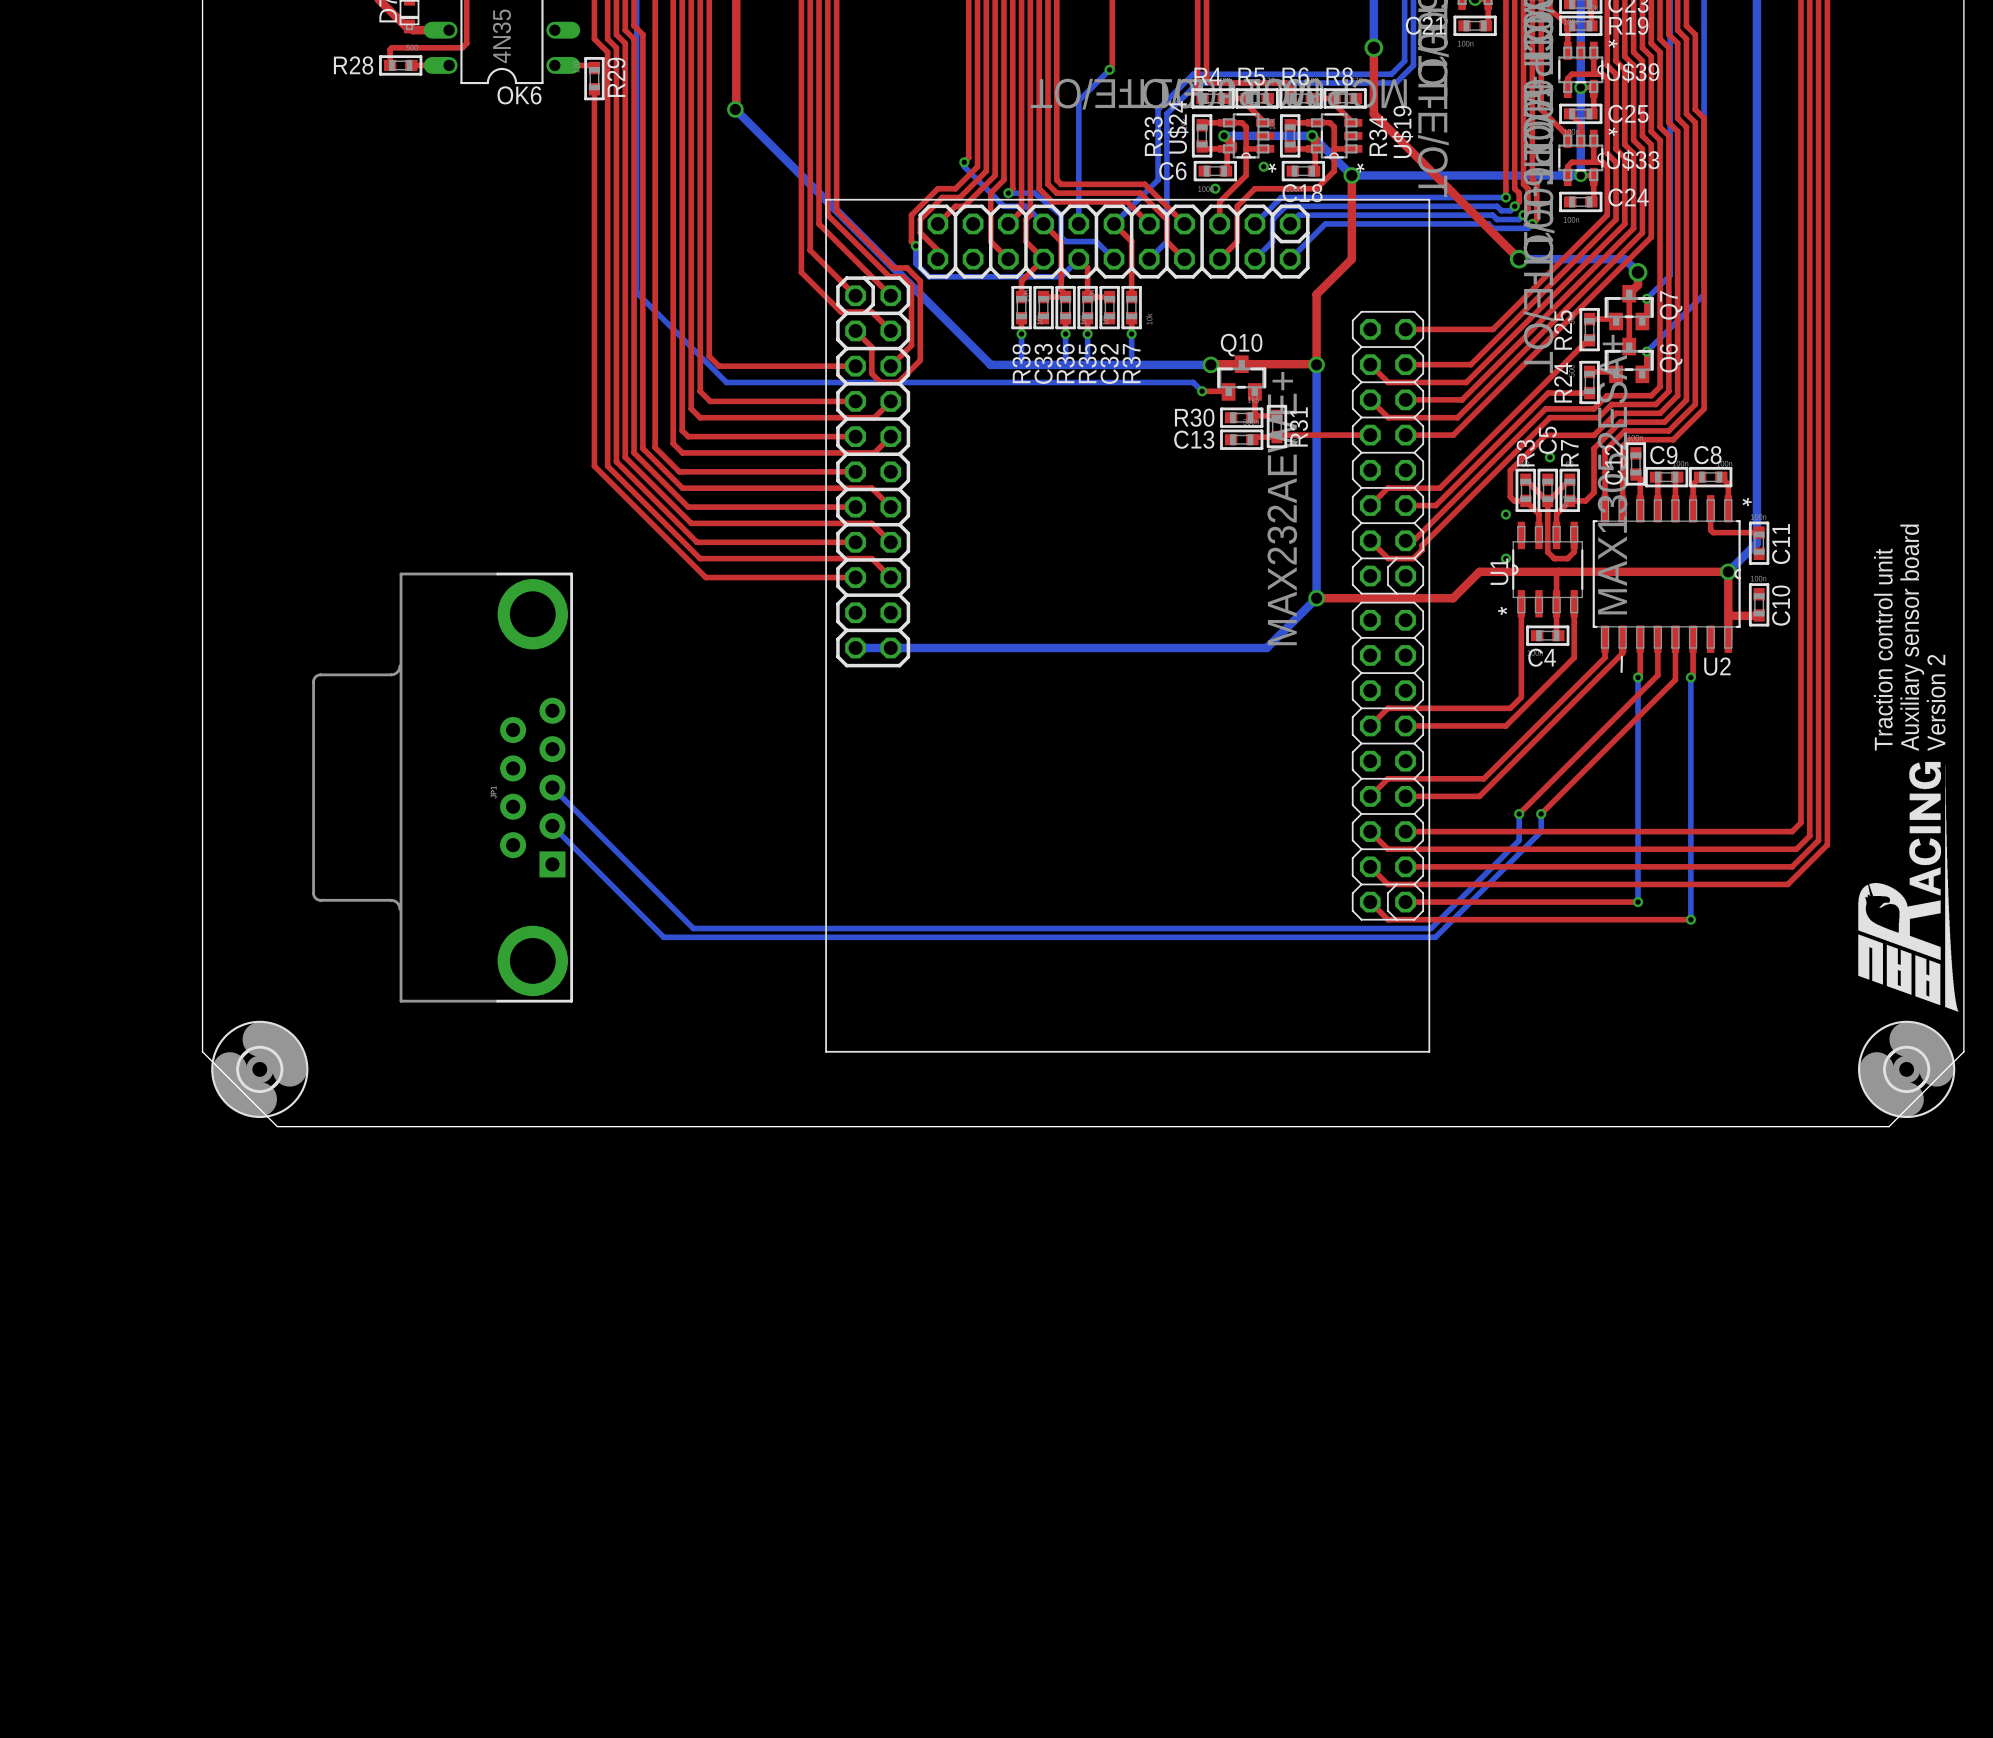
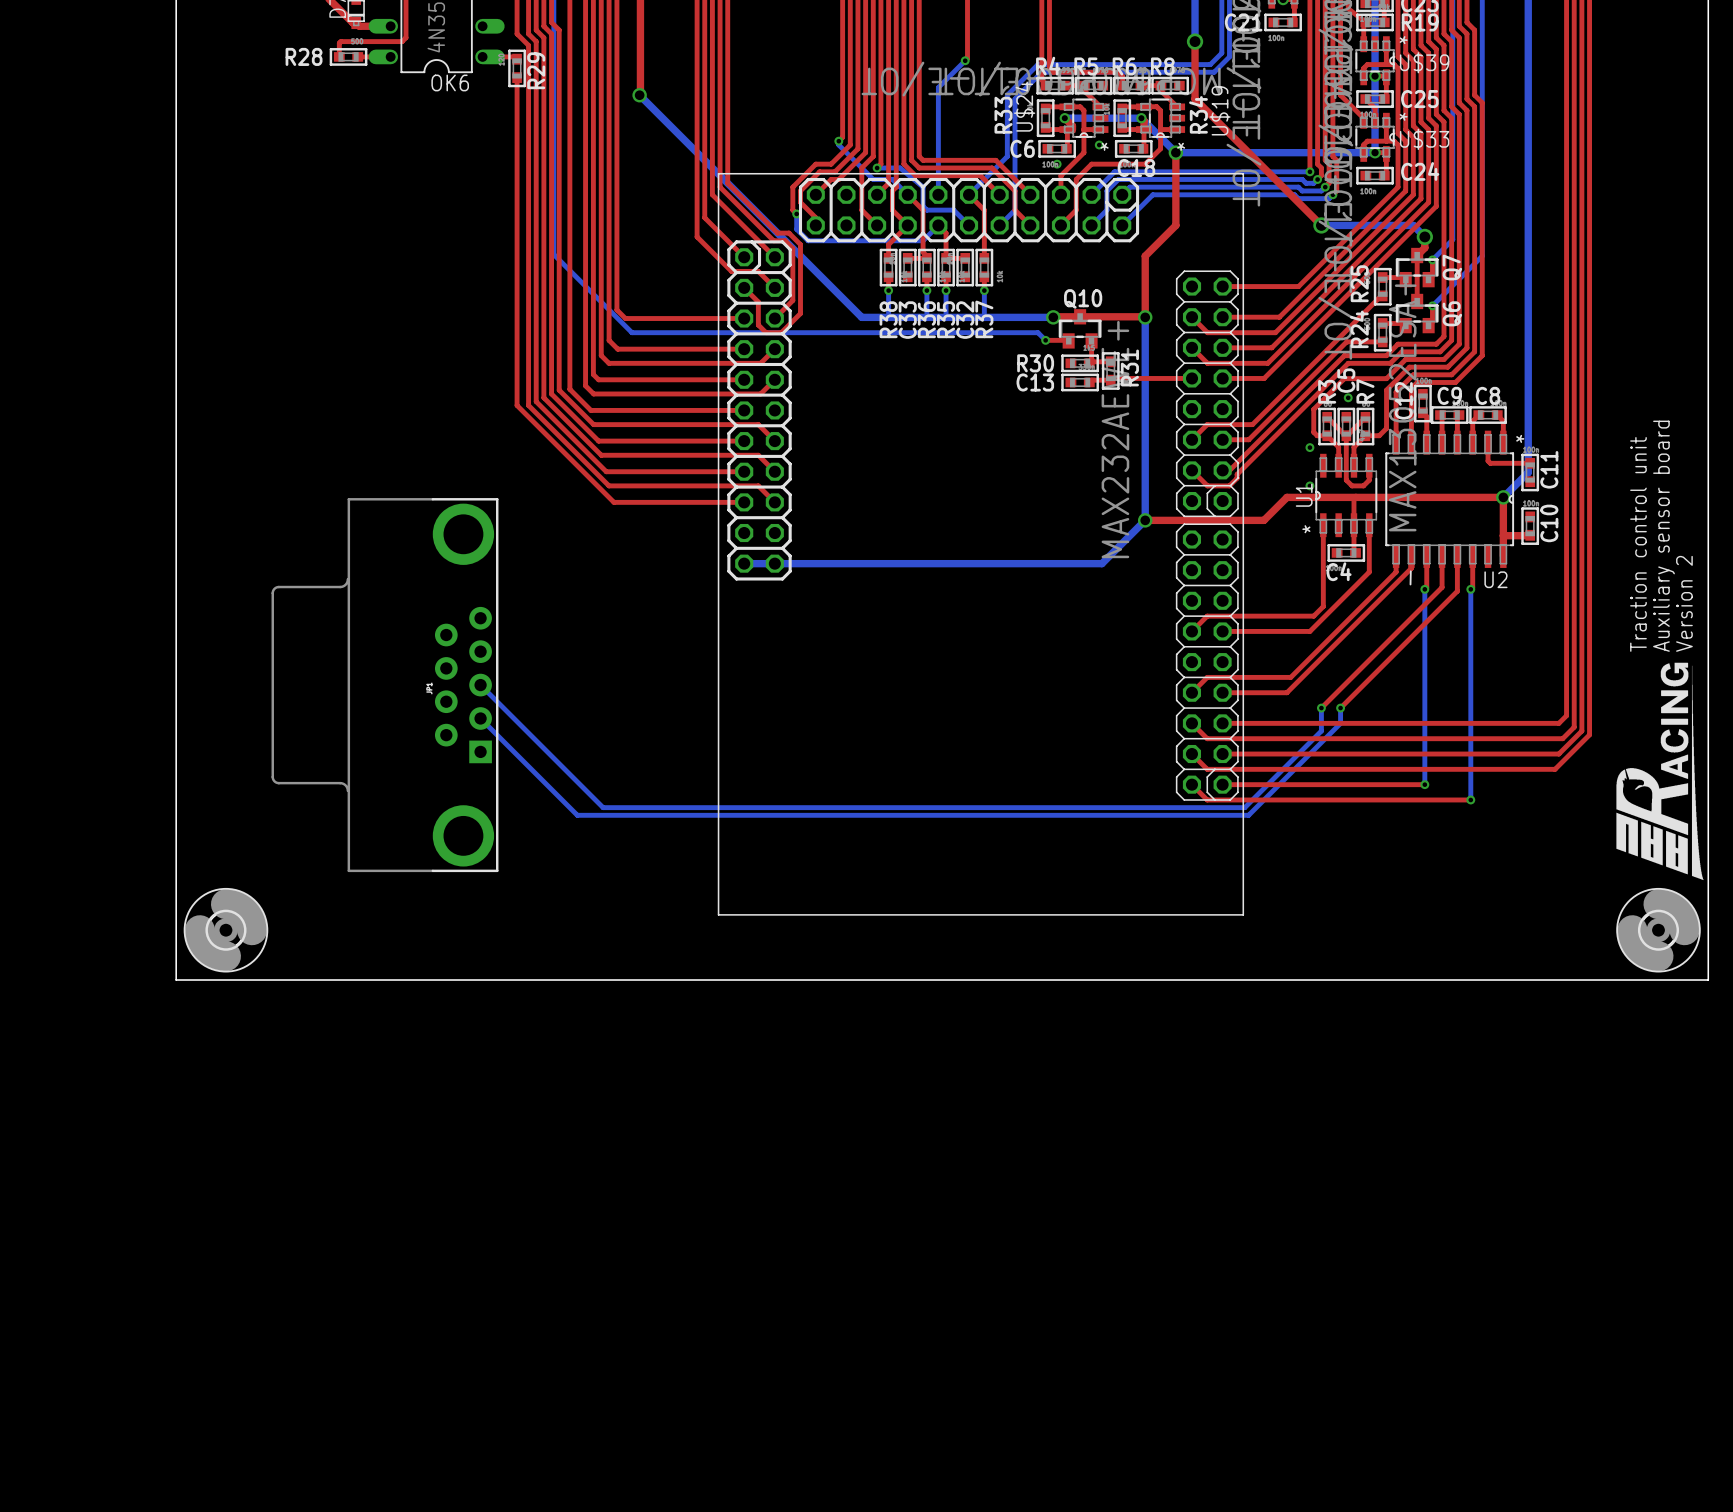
board edge: (202, 1051) (277, 1126) -> (176, 914) (176, 980) (241, 980)
board edge: (1963, 1051) (1889, 1126) -> (1708, 914) (1708, 980) (1643, 980)

